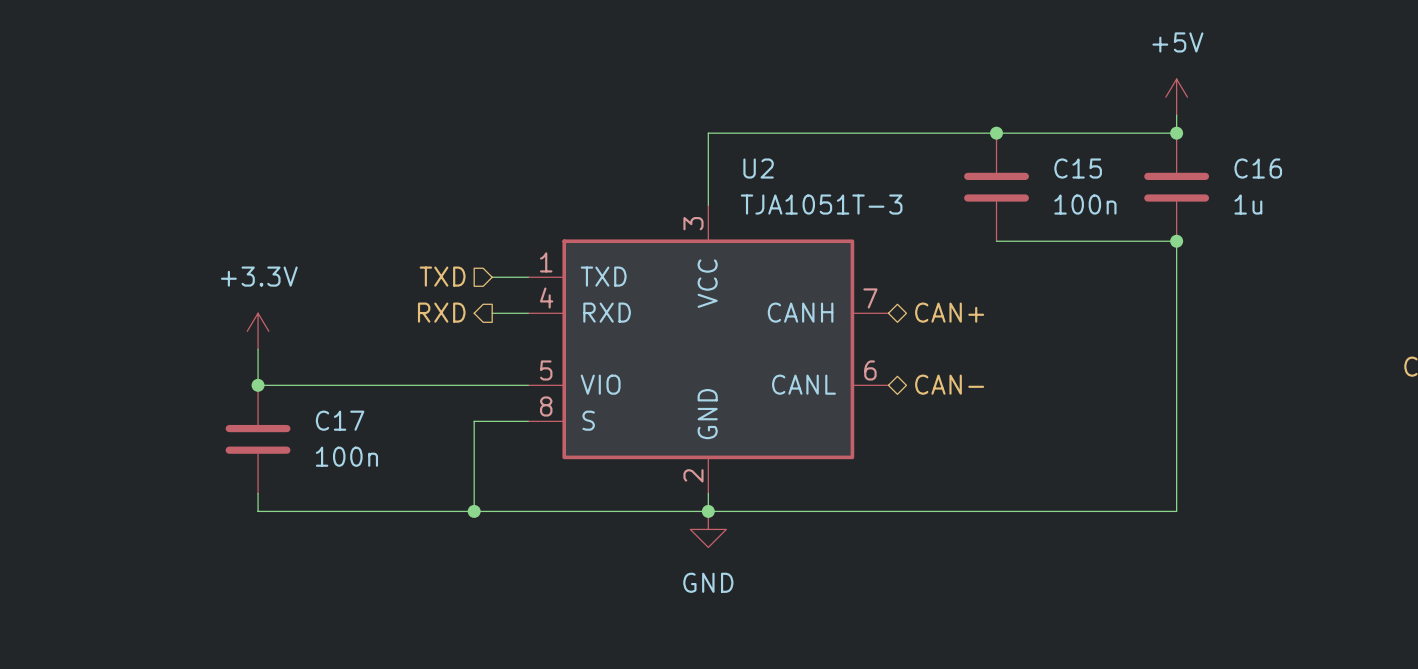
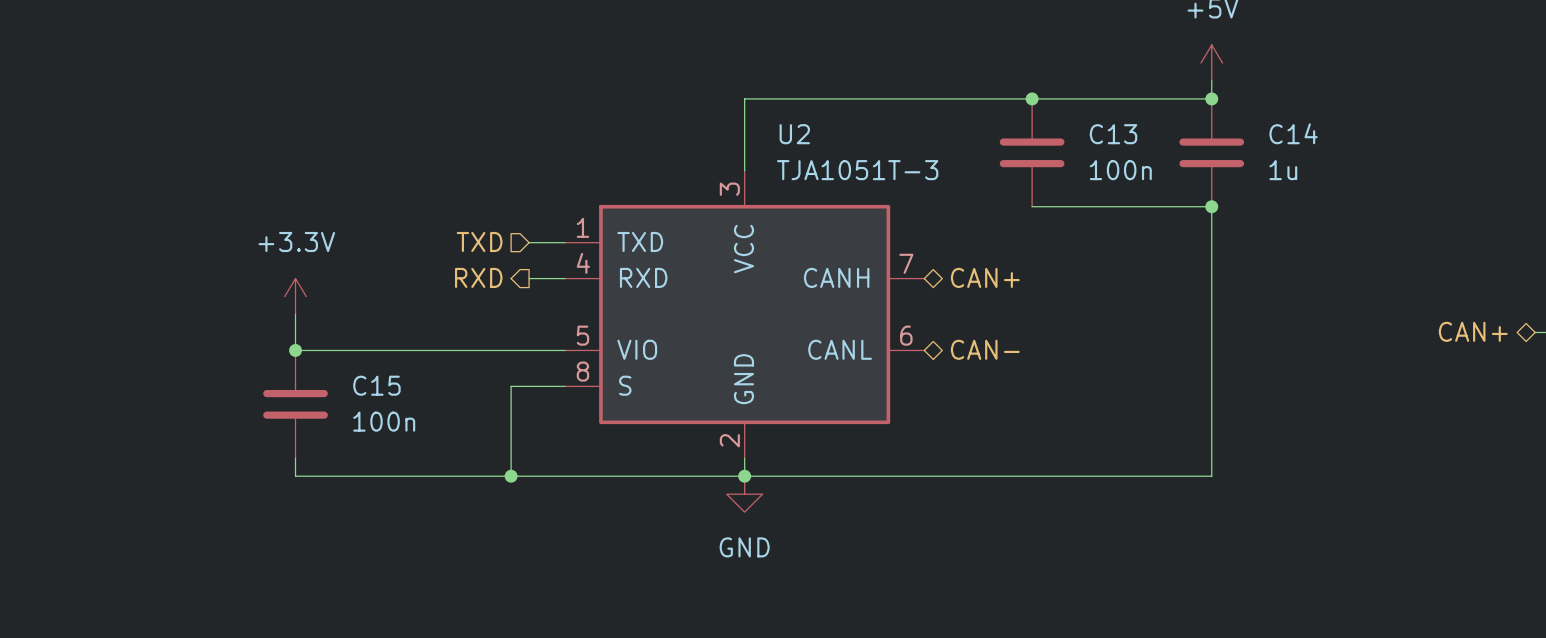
C15 name: C15 (1078, 168) -> C13 (1113, 134)
C16 name: C16 (1258, 168) -> C14 (1293, 133)
C17 name: C17 (340, 420) -> C15 (376, 385)

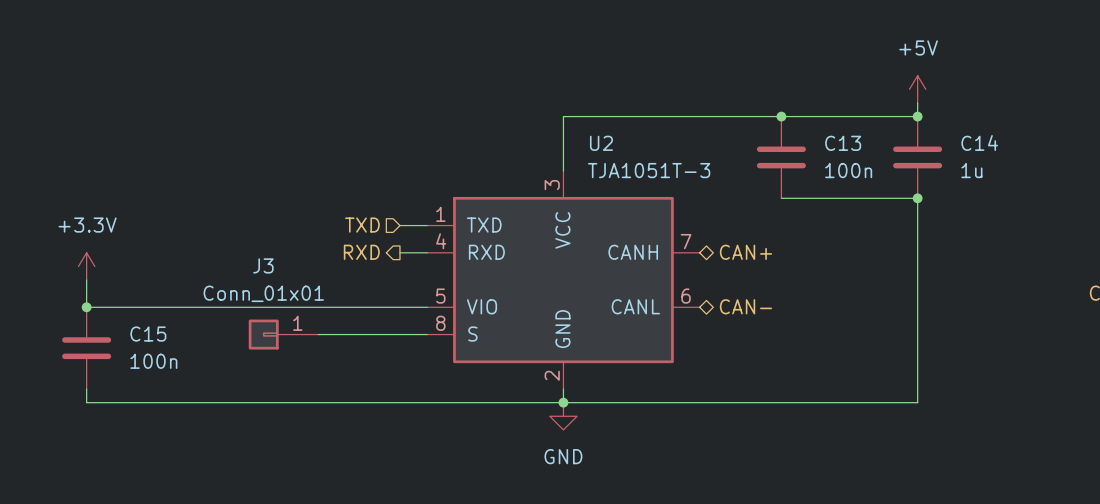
power symbol position: +3.3V (295, 296) -> +3.3V (86, 266)
wire: (295, 314) (295, 350) -> (86, 280) (86, 307) (222, 307)
junction: none -> (86, 307)
junction: (295, 350) -> none
J3: none -> Conn_01x01 (283, 334)
wire: (511, 386) (511, 476) -> (386, 334) (318, 334)
C15 position: (295, 404) -> (86, 348)
wire: (295, 458) (295, 476) -> (86, 389) (86, 402) (222, 402)
junction: (511, 476) -> none

